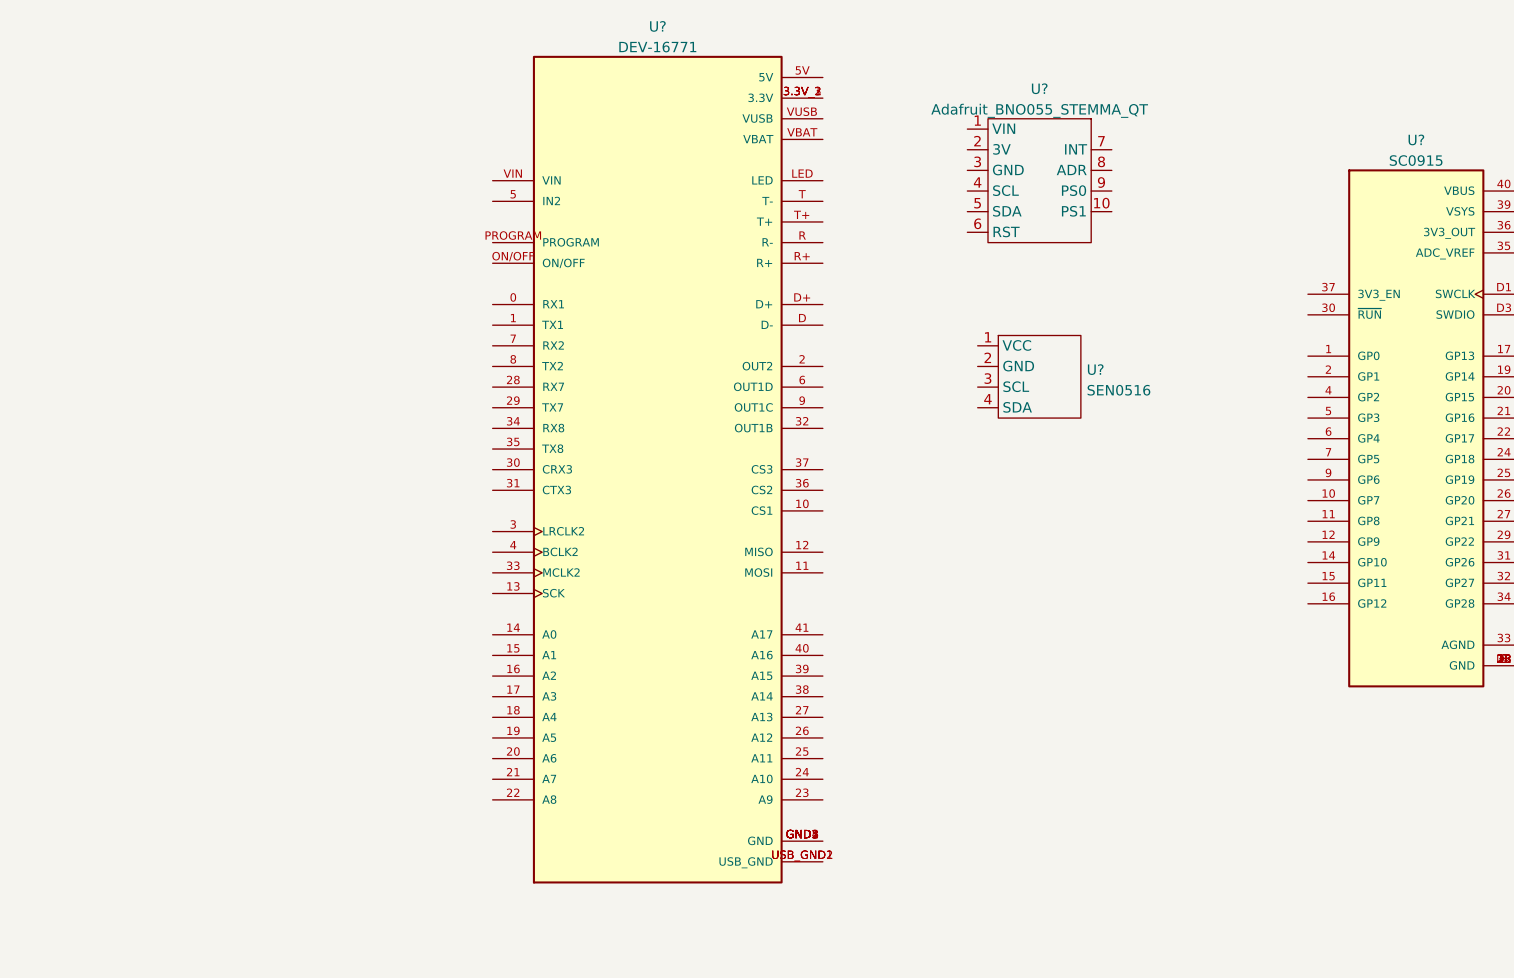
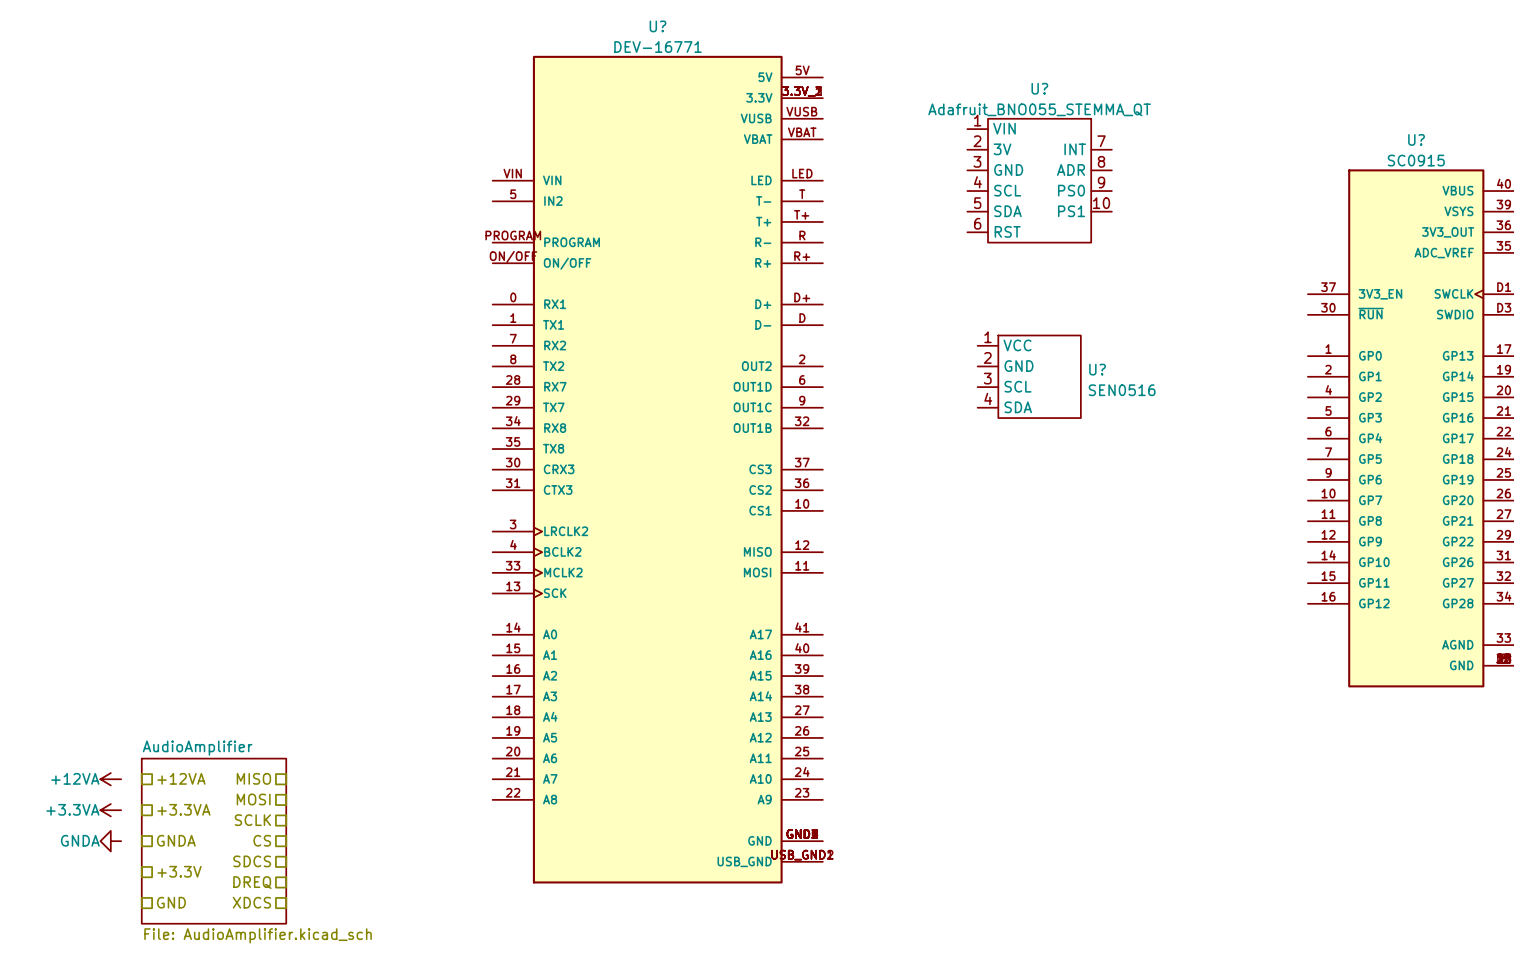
hierarchical label: none -> +12VA (181, 778)
hierarchical label: none -> MISO (253, 778)
power symbol: none -> +12VA (110, 779)
hierarchical label: none -> MOSI (253, 799)
hierarchical label: none -> +3.3VA (183, 809)
power symbol: none -> +3.3VA (110, 810)
hierarchical label: none -> SCLK (252, 820)
hierarchical label: none -> GNDA (176, 840)
hierarchical label: none -> CS (262, 840)
power symbol: none -> GNDA (110, 841)
sheet AudioAmplifier: none -> File: AudioAmplifier.kicad_sch (214, 841)
hierarchical label: none -> SDCS (252, 861)
hierarchical label: none -> +3.3V (179, 871)
hierarchical label: none -> DREQ (252, 882)
hierarchical label: none -> GND (171, 902)
hierarchical label: none -> XDCS (251, 902)

